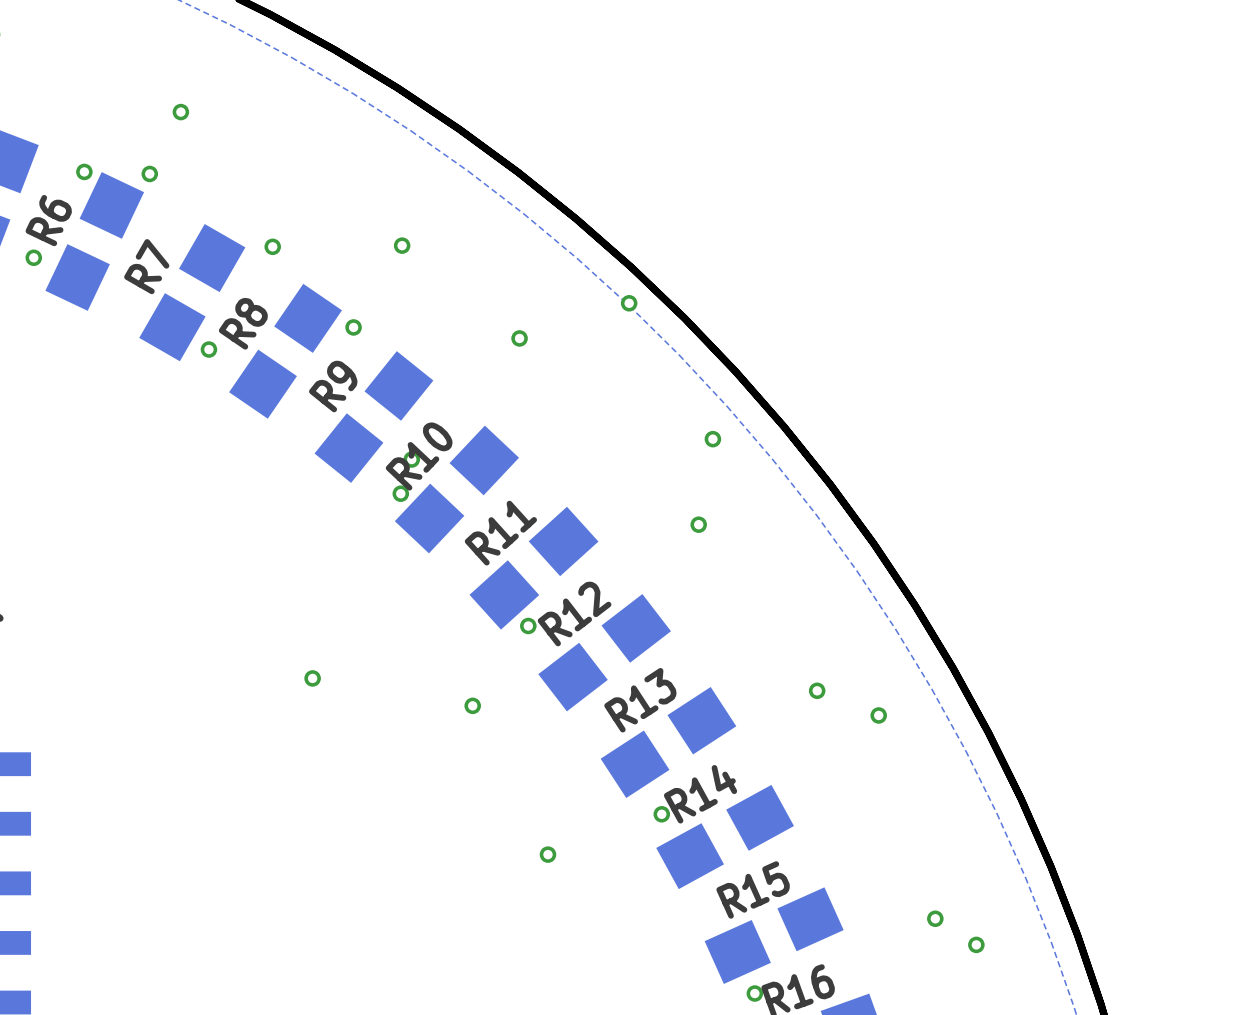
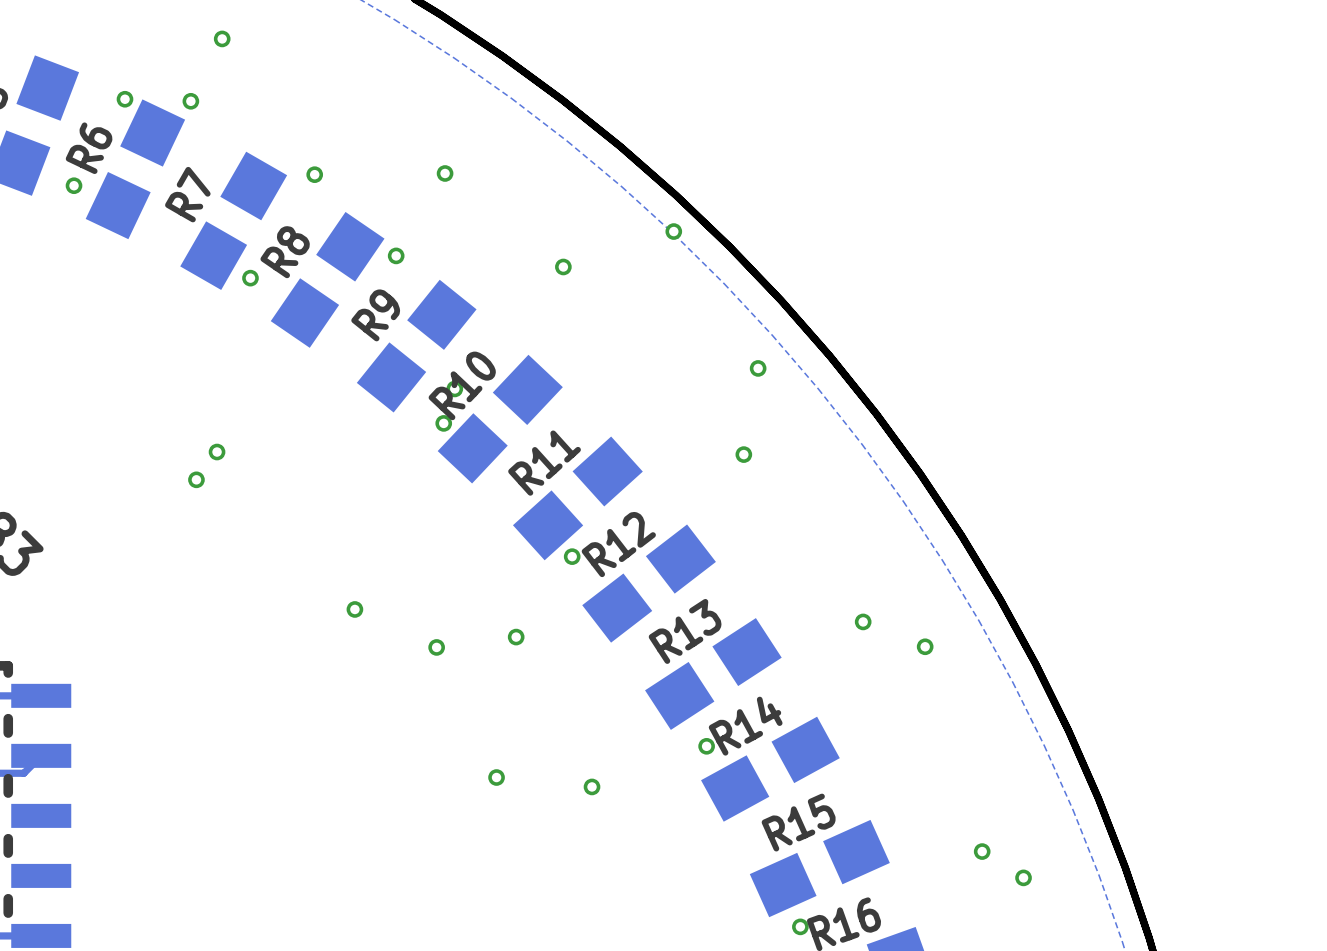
via: none -> (217, 452)
via: none -> (196, 479)
via: none -> (436, 647)
via: none -> (496, 777)

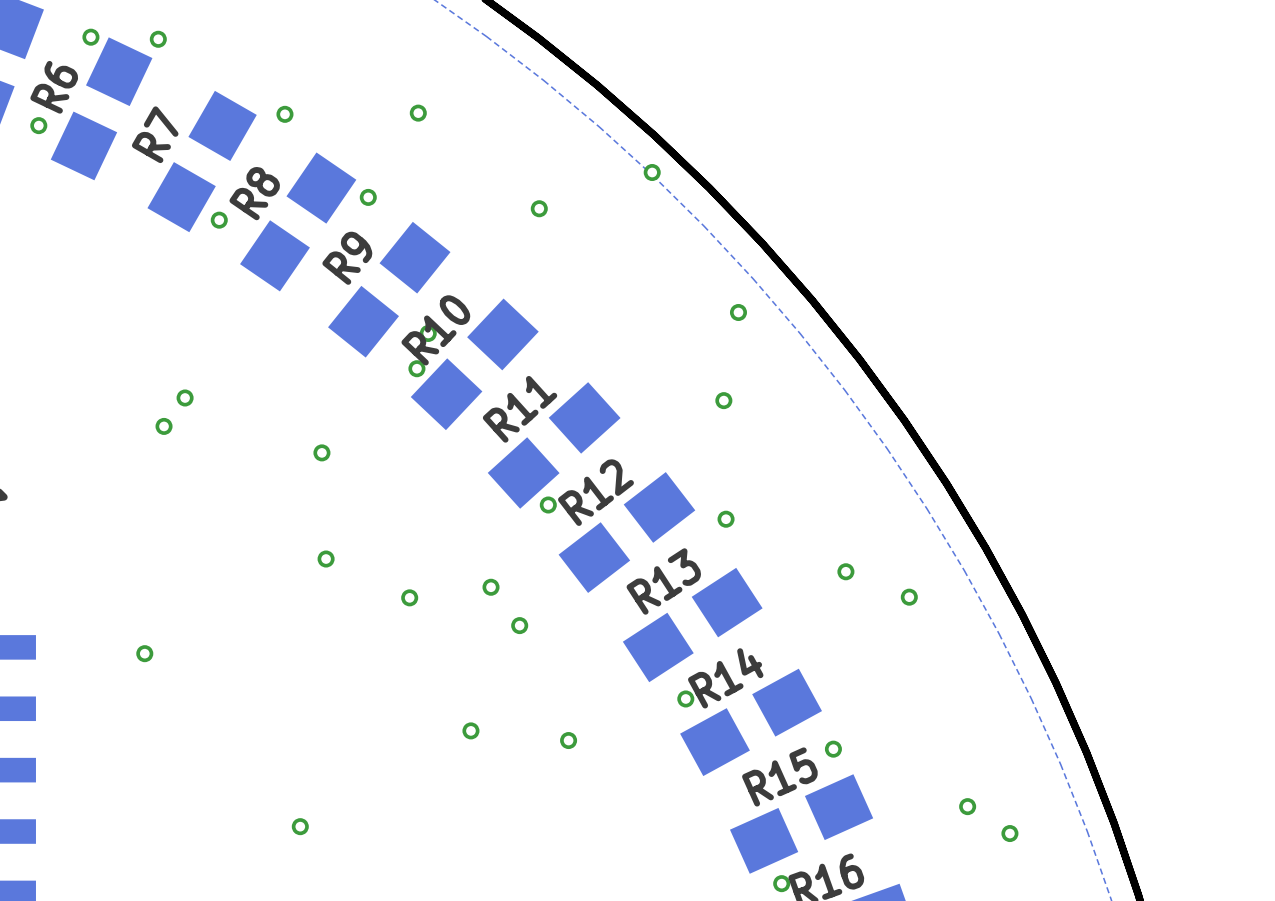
via: none -> (321, 452)
via: none -> (726, 519)
via: none -> (519, 625)
via: none -> (144, 653)
via: none -> (833, 749)
via: none -> (300, 826)

